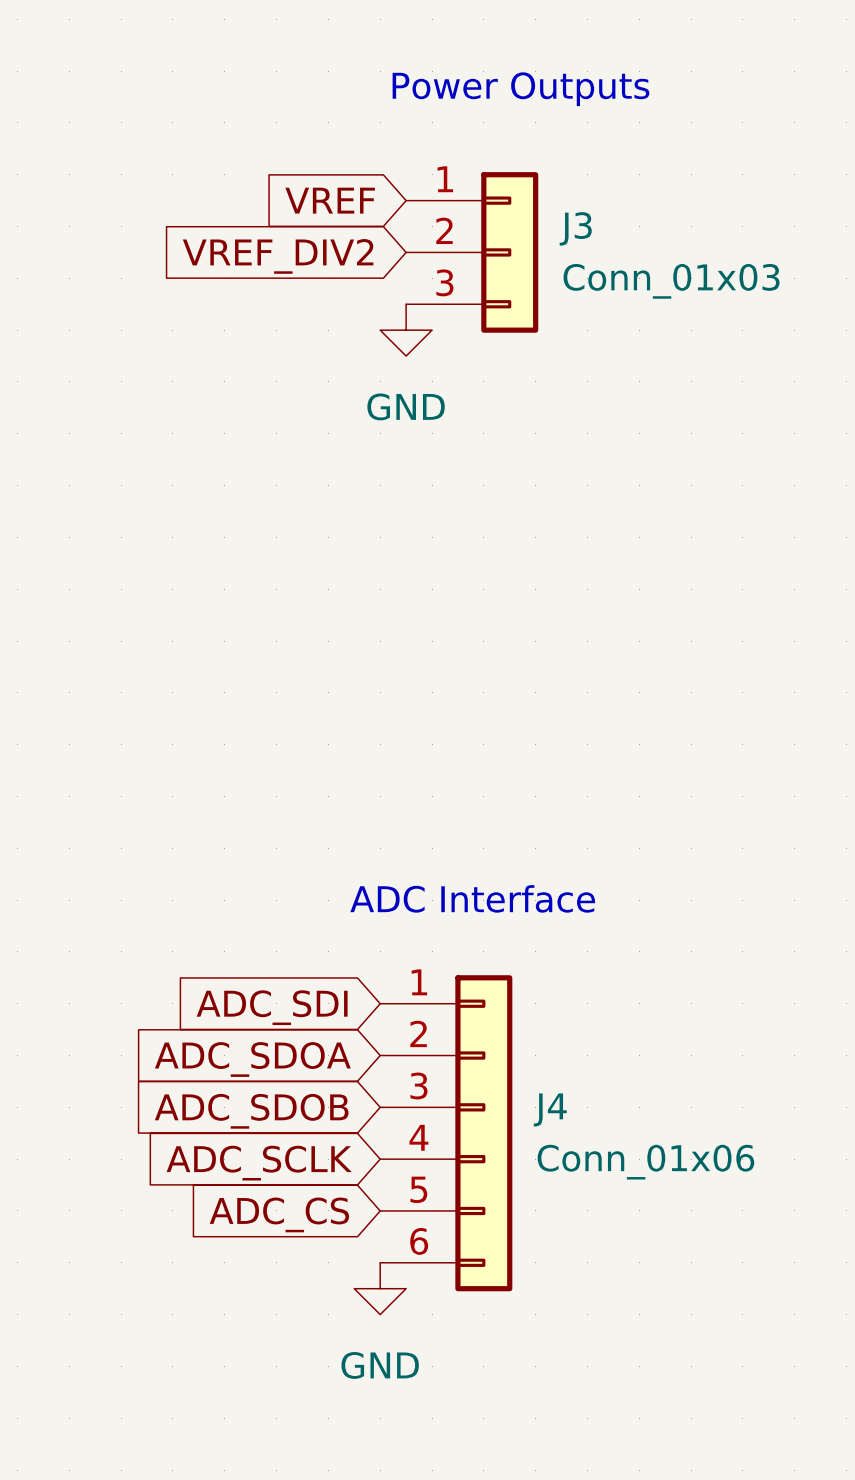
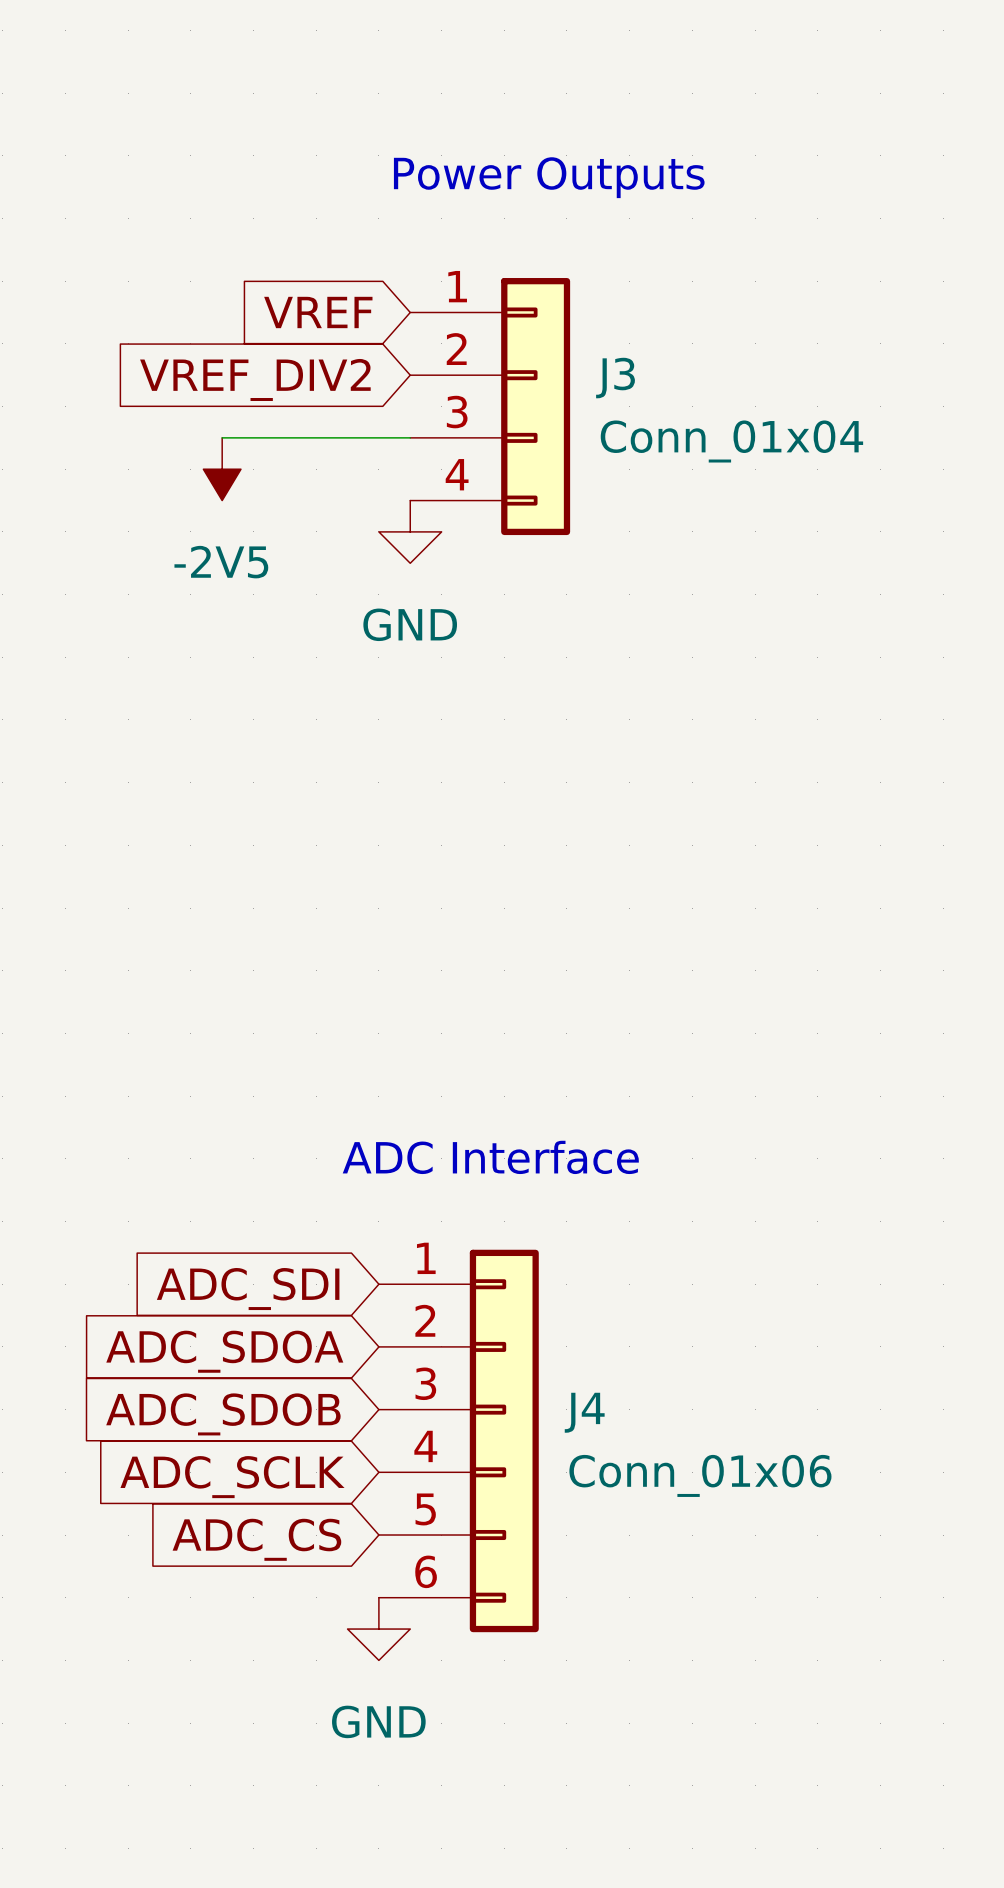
J3 symbol: [406, 172, 539, 333] -> [410, 278, 571, 536]
J3 value: Conn_01x03 (671, 281) -> Conn_01x04 (731, 441)
wire: none -> (222, 437) (410, 437)
power symbol: none -> -2V5 (222, 469)
power symbol position: GND (406, 330) -> GND (410, 531)

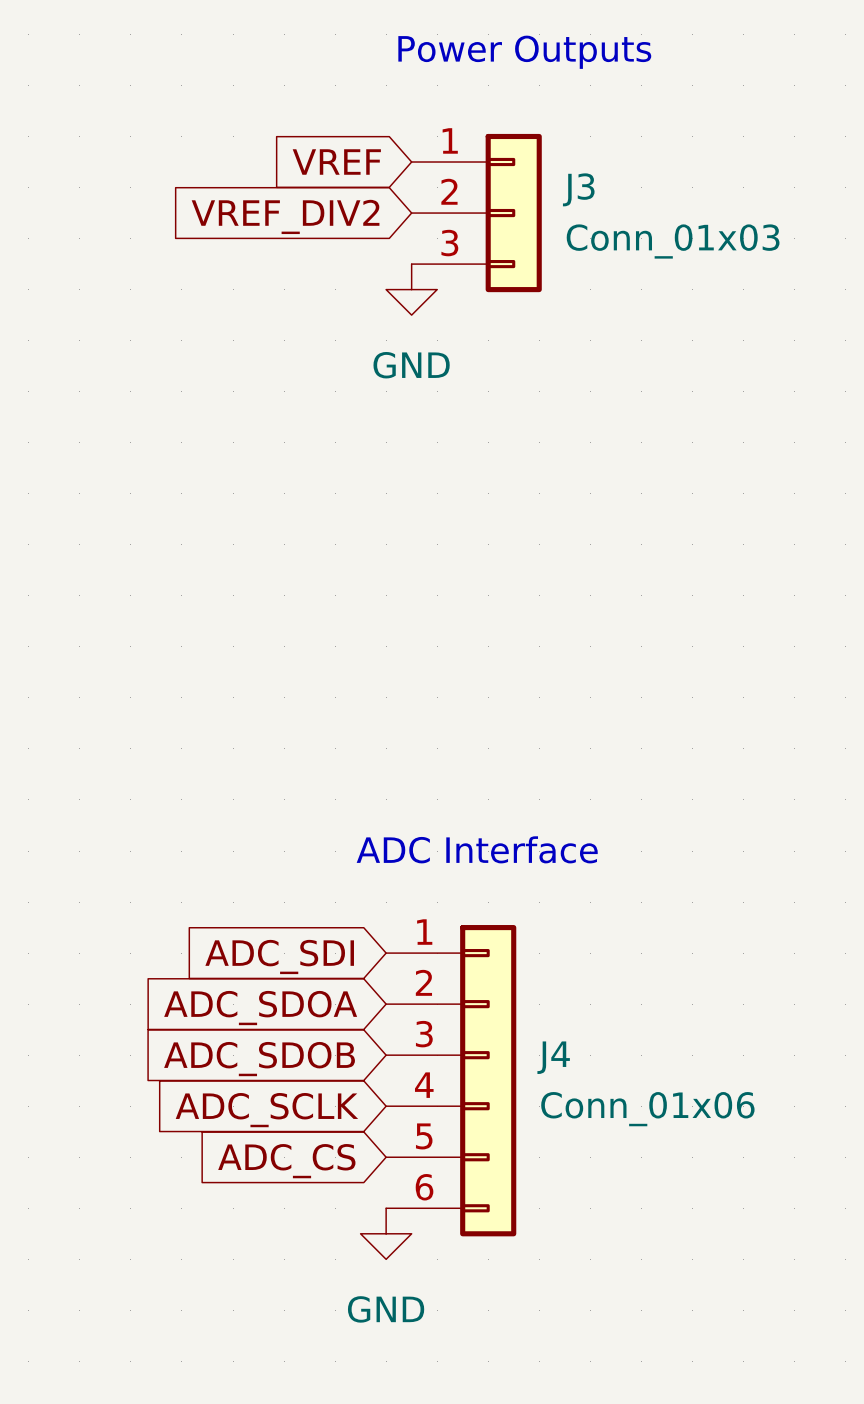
J3 symbol: [410, 278, 571, 536] -> [411, 133, 542, 293]
wire: (222, 437) (410, 437) -> none
J3 value: Conn_01x04 (731, 441) -> Conn_01x03 (673, 241)
power symbol: -2V5 (222, 469) -> none
power symbol position: GND (410, 531) -> GND (411, 289)

